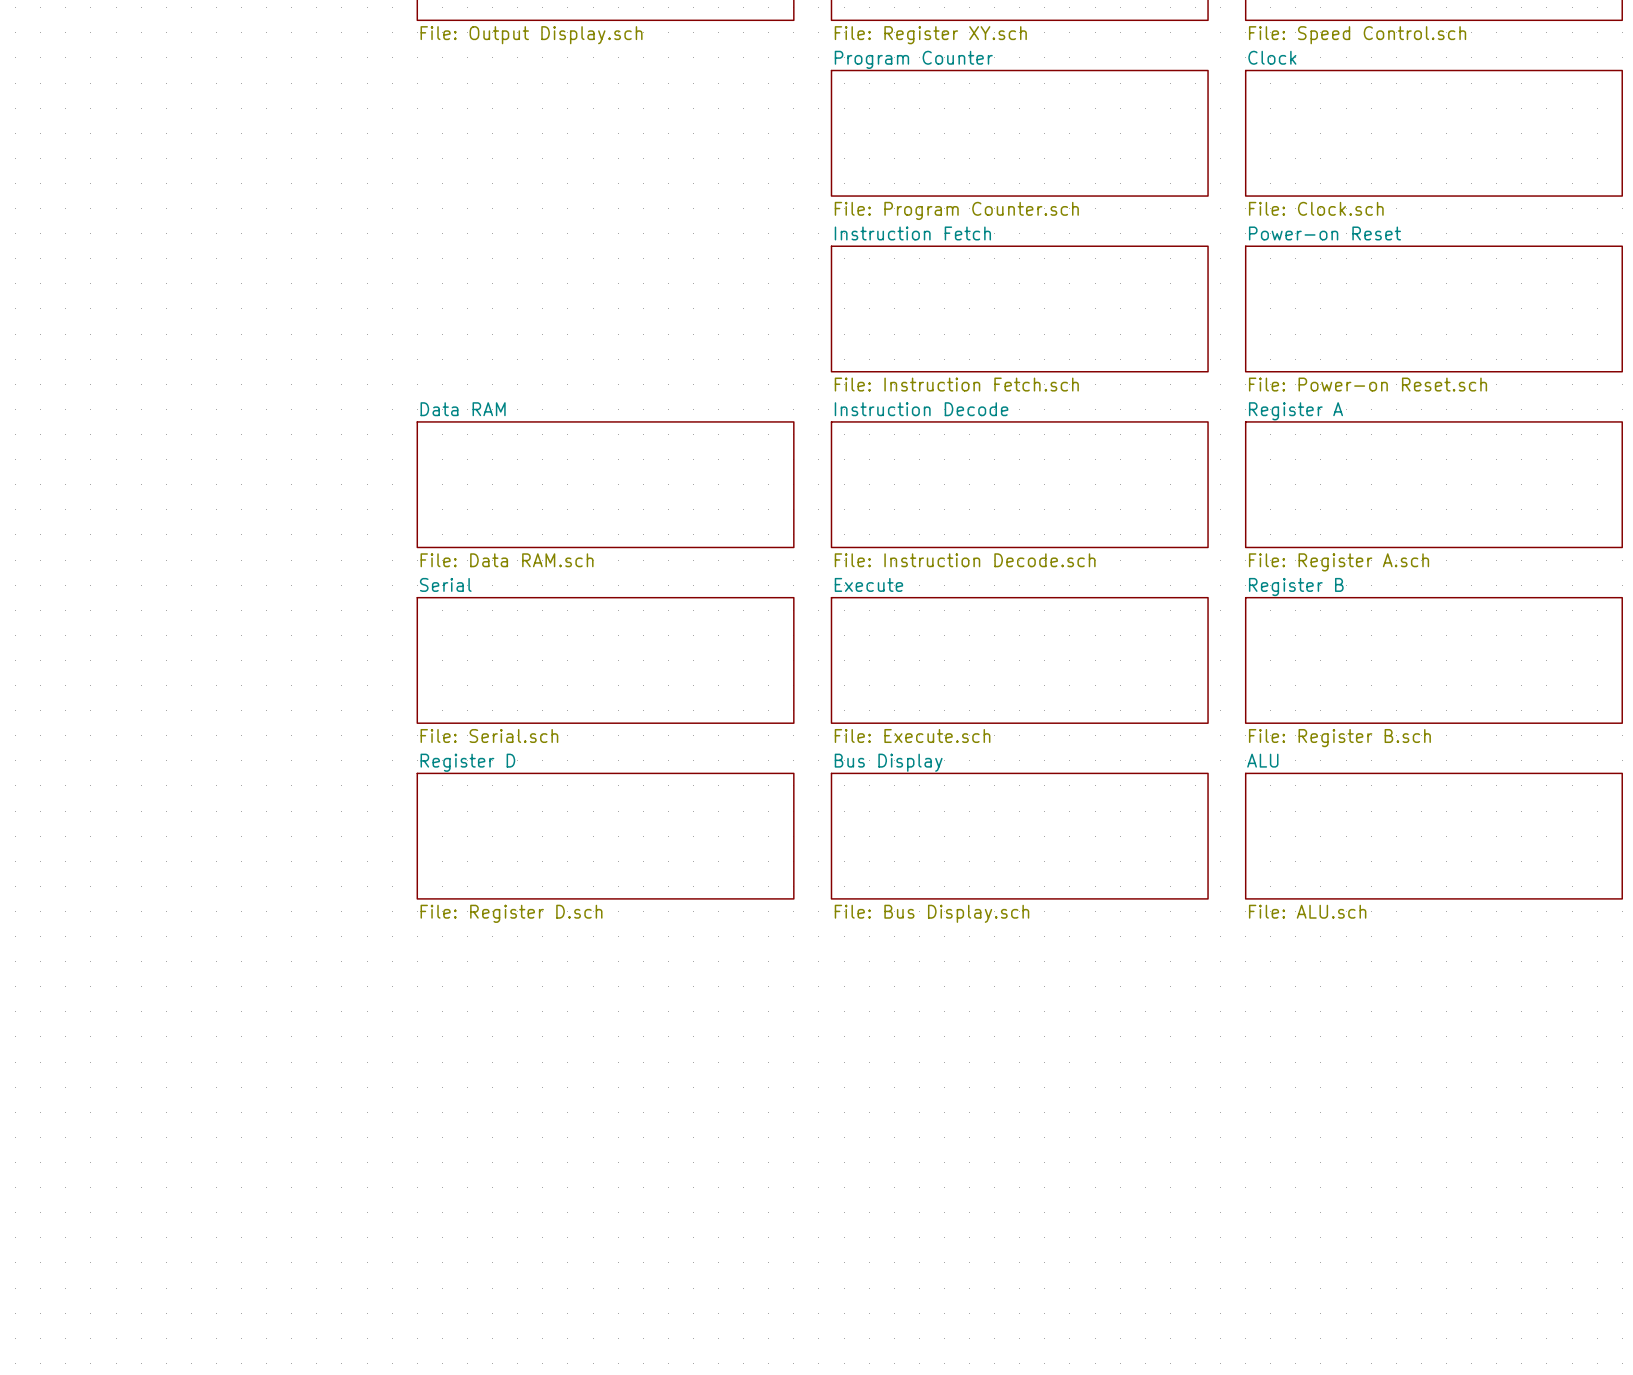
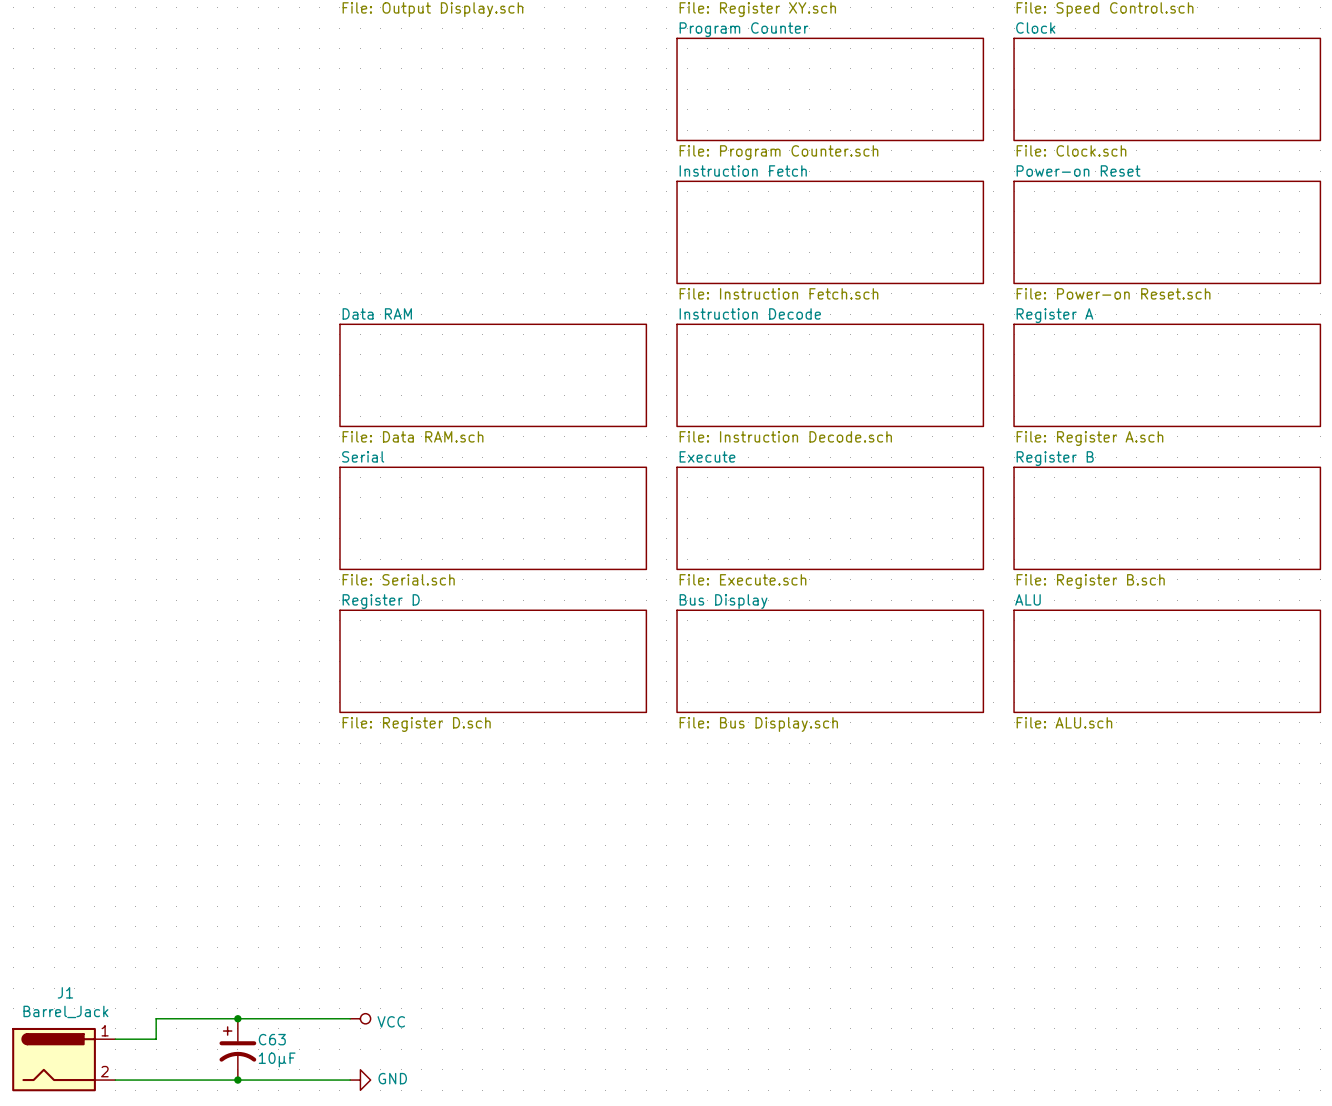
junction: none -> (237, 1018)
wire: none -> (350, 1018) (156, 1018) (156, 1039) (115, 1039)
power symbol: none -> VCC (360, 1018)
C63: none -> 10µF (237, 1049)
J1: none -> Barrel_Jack (63, 1059)
wire: none -> (115, 1080) (350, 1080)
junction: none -> (237, 1080)
power symbol: none -> GND (360, 1080)

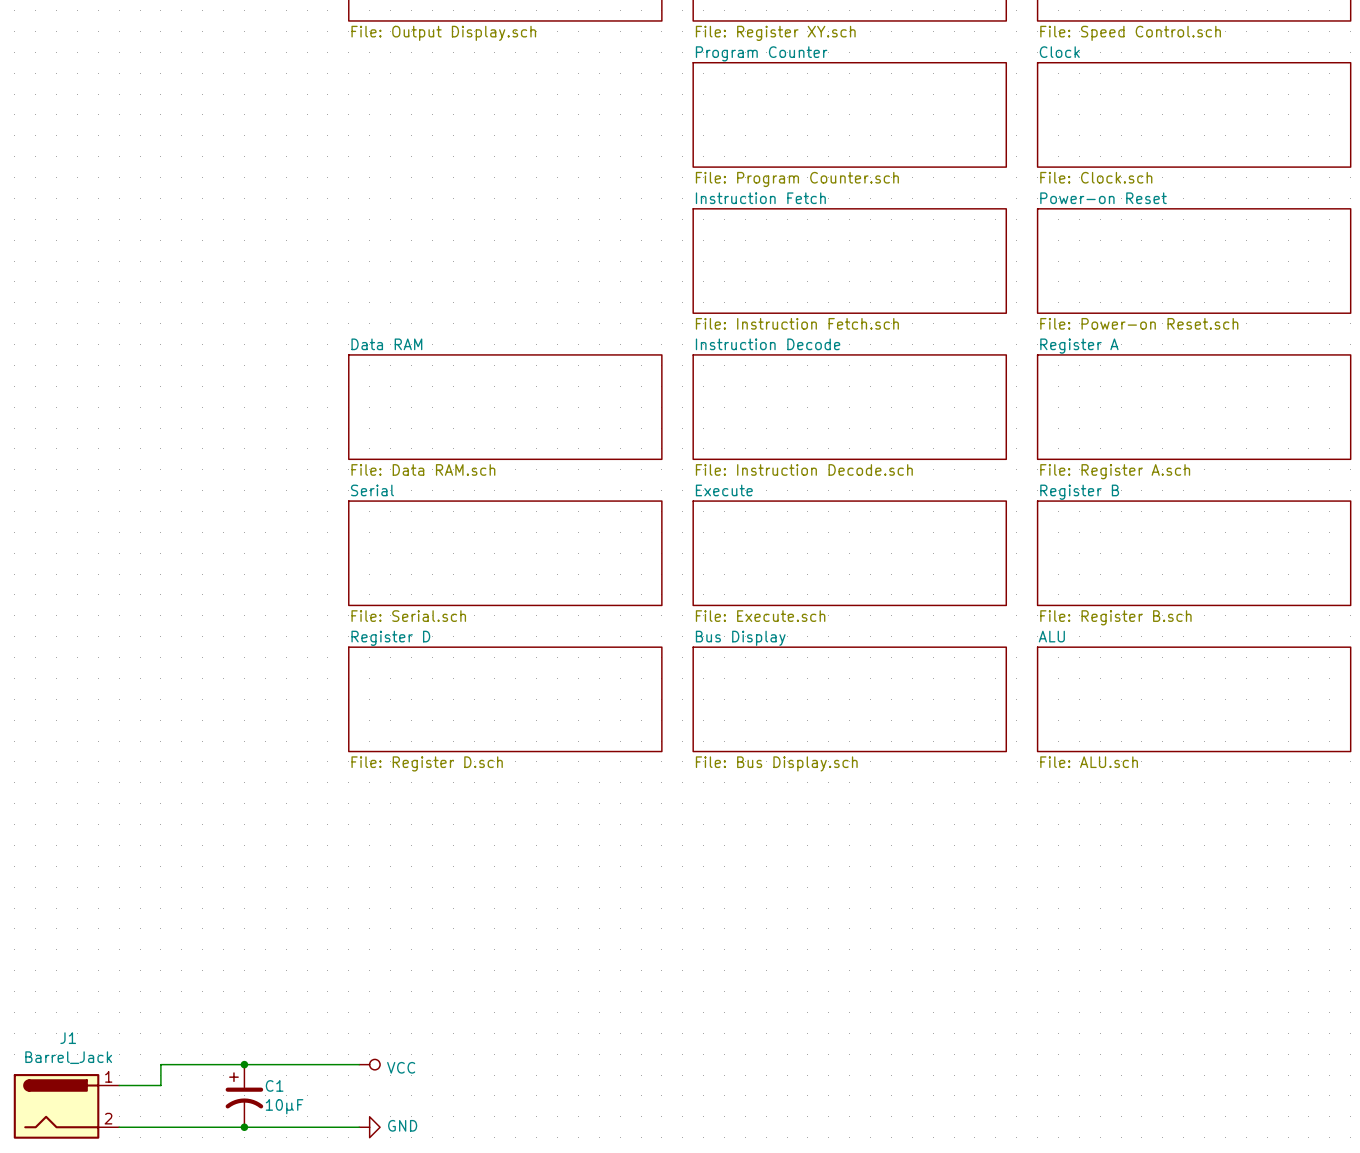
C63 name: C63 (272, 1039) -> C1 (274, 1085)

